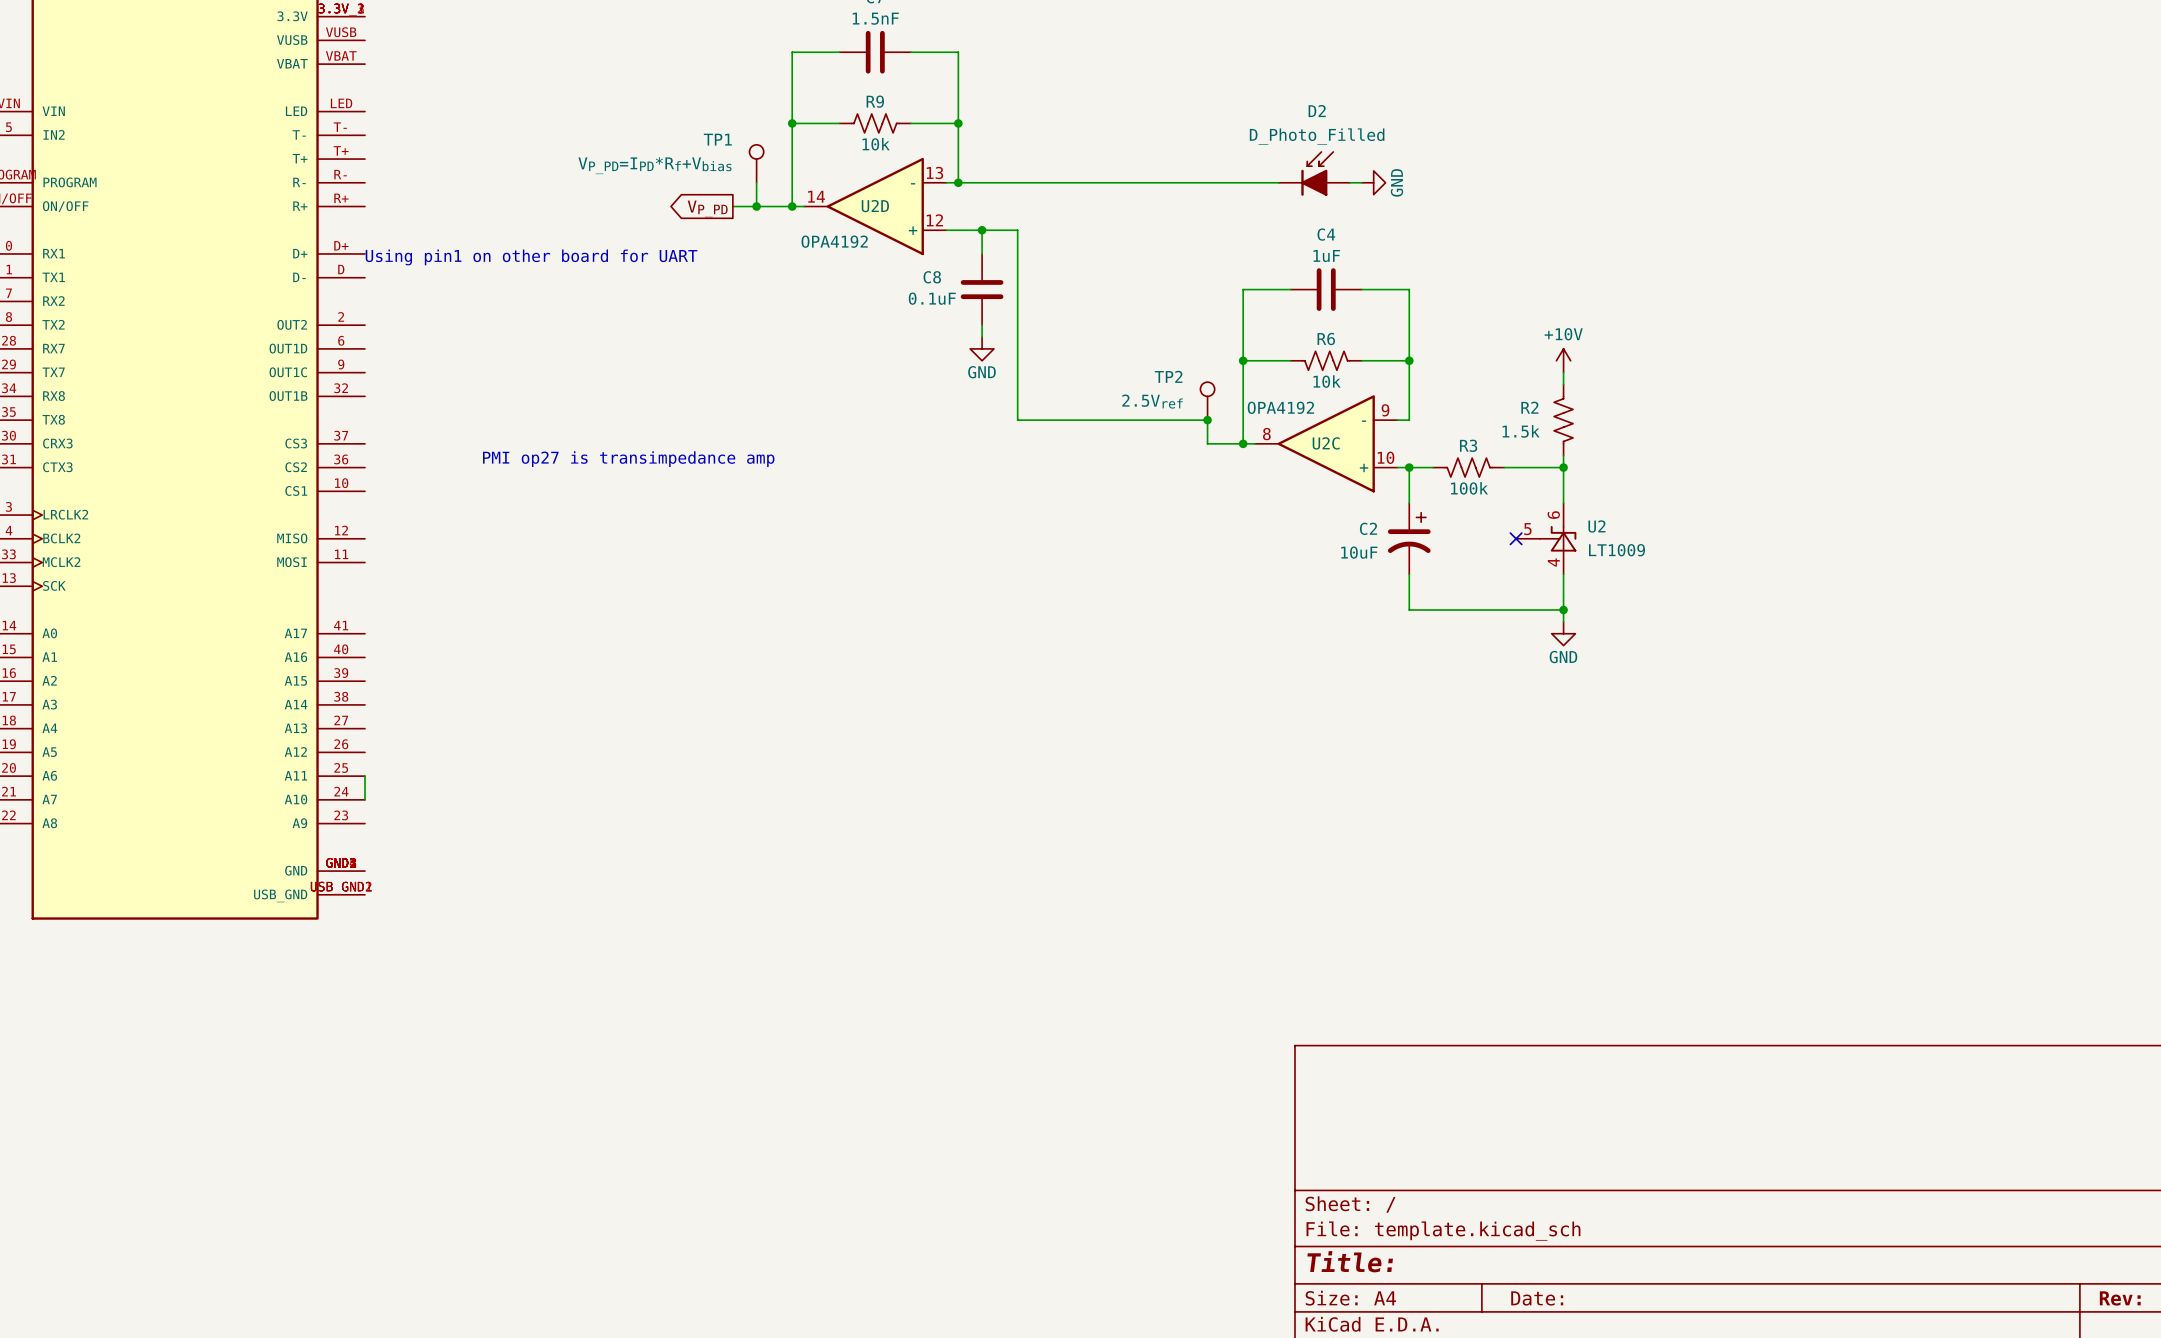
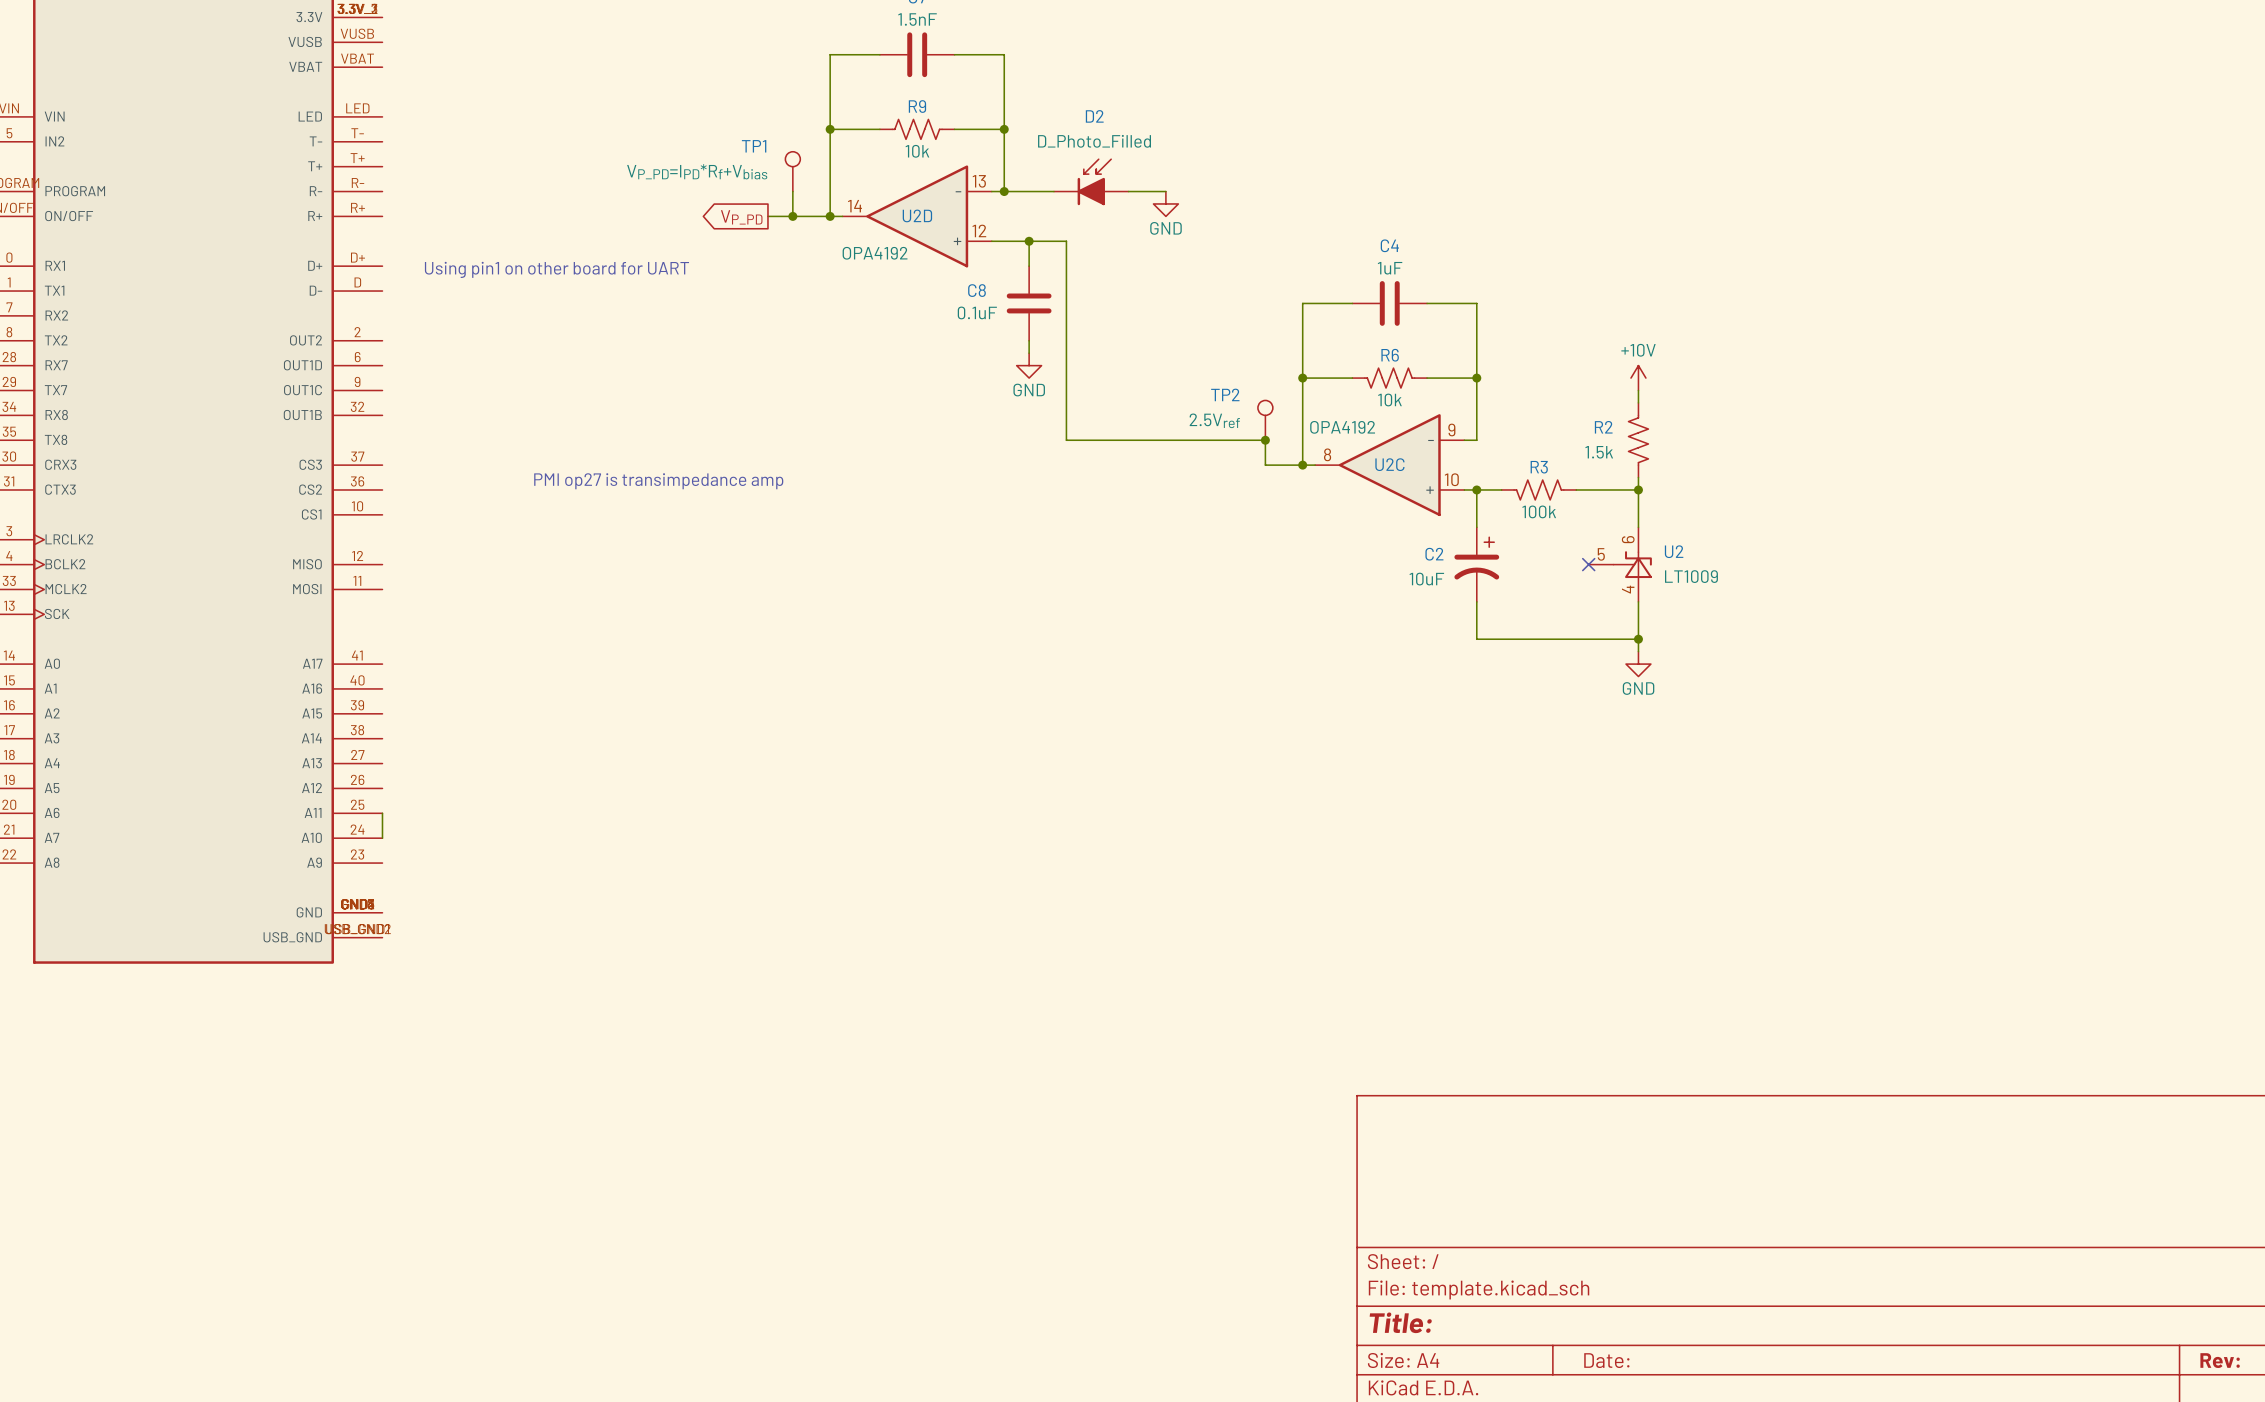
D2 position: (1314, 173) -> (1091, 182)
wire: (1112, 182) (1278, 182) -> none
wire: (1349, 182) (1361, 182) -> none
power symbol: GND (1373, 182) -> none
power symbol: none -> GND (1165, 203)

